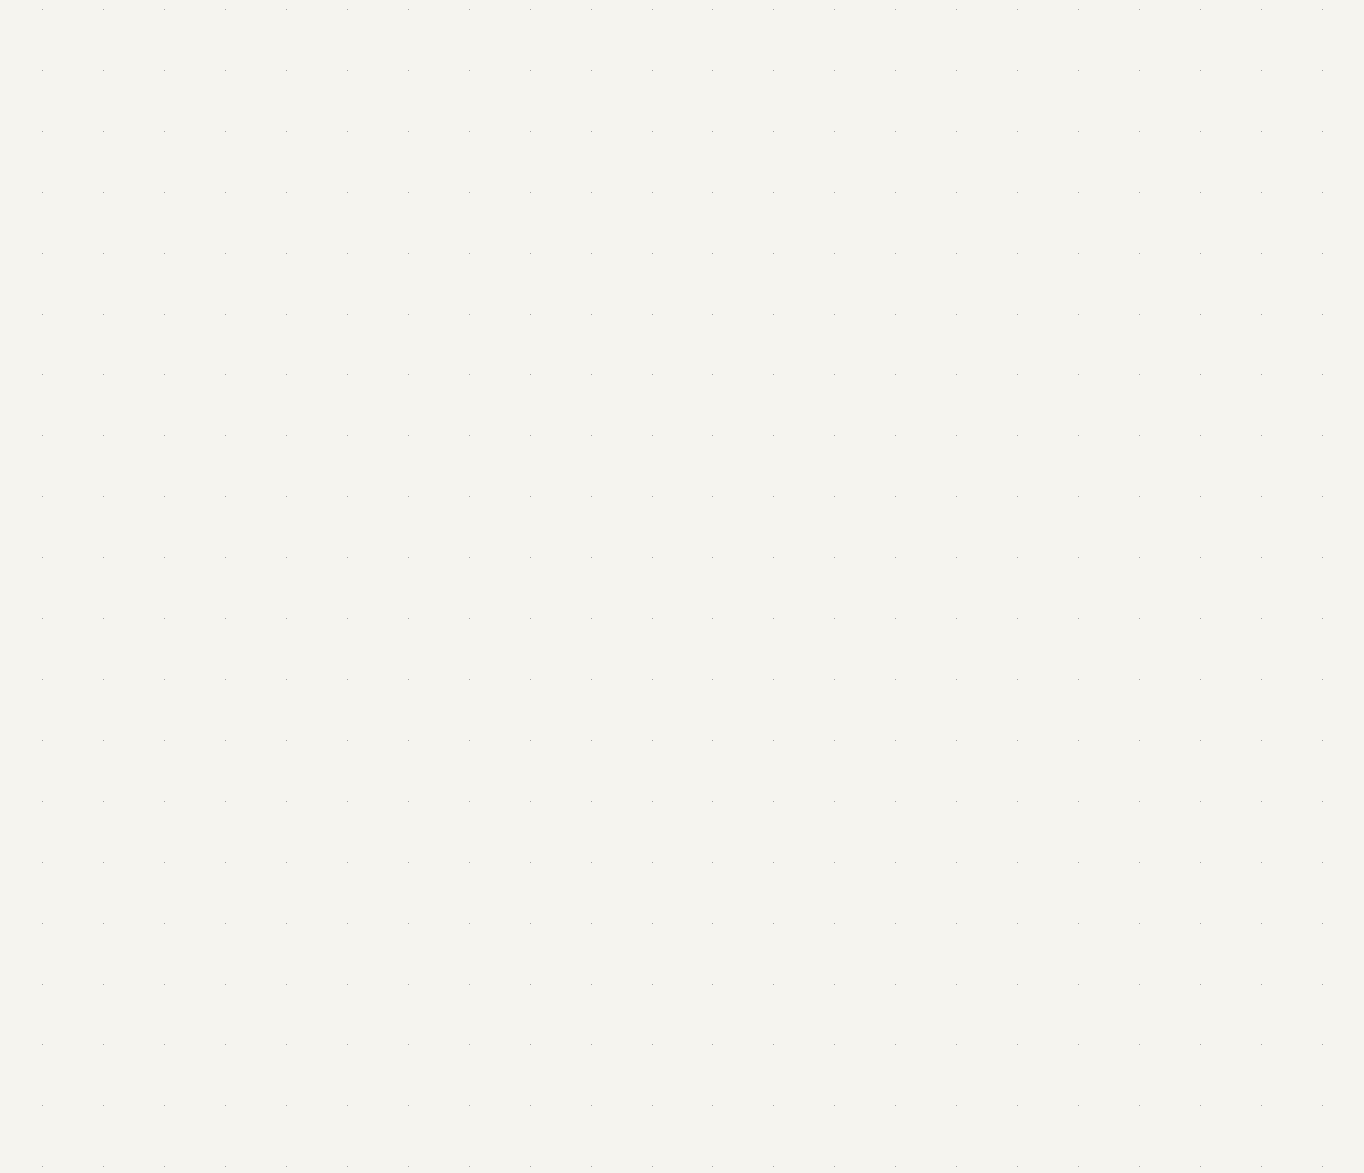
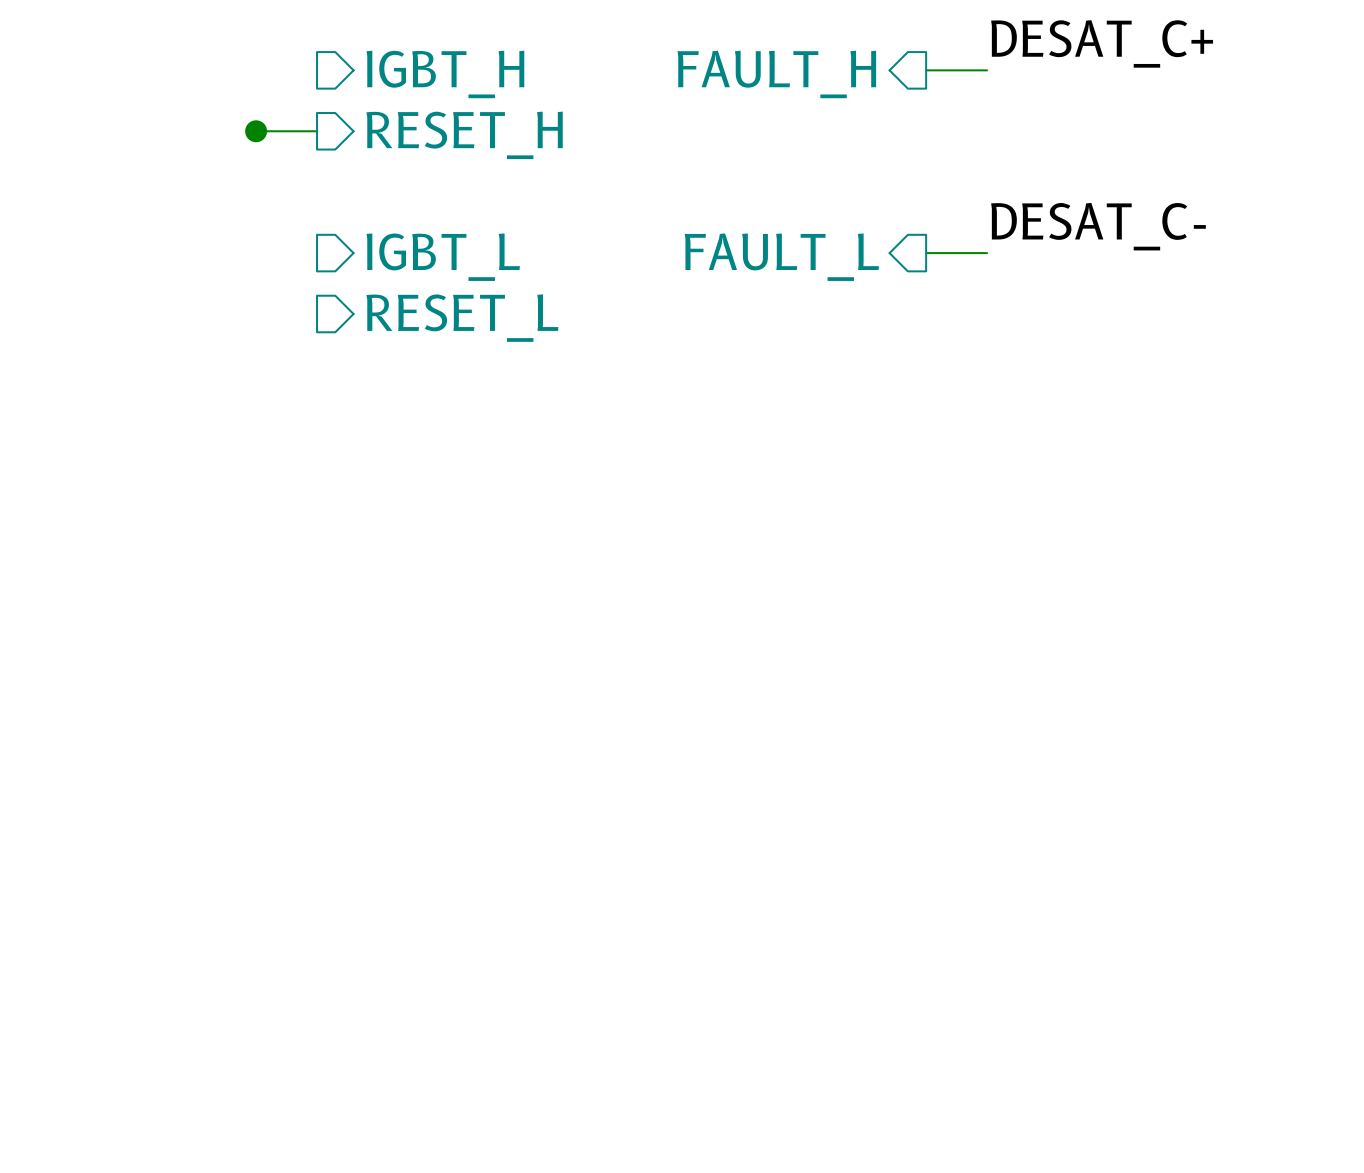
label: none -> DESAT_C+ (1102, 43)
sheet pin: none -> IGBT_H (445, 74)
sheet pin: none -> FAULT_H (776, 74)
wire: none -> (926, 70) (987, 70)
wire: none -> (256, 131) (317, 131)
junction: none -> (256, 131)
sheet pin: none -> RESET_H (464, 135)
label: none -> DESAT_C- (1098, 226)
sheet pin: none -> IGBT_L (443, 257)
sheet pin: none -> FAULT_L (781, 257)
wire: none -> (926, 253) (987, 253)
sheet pin: none -> RESET_L (462, 318)

